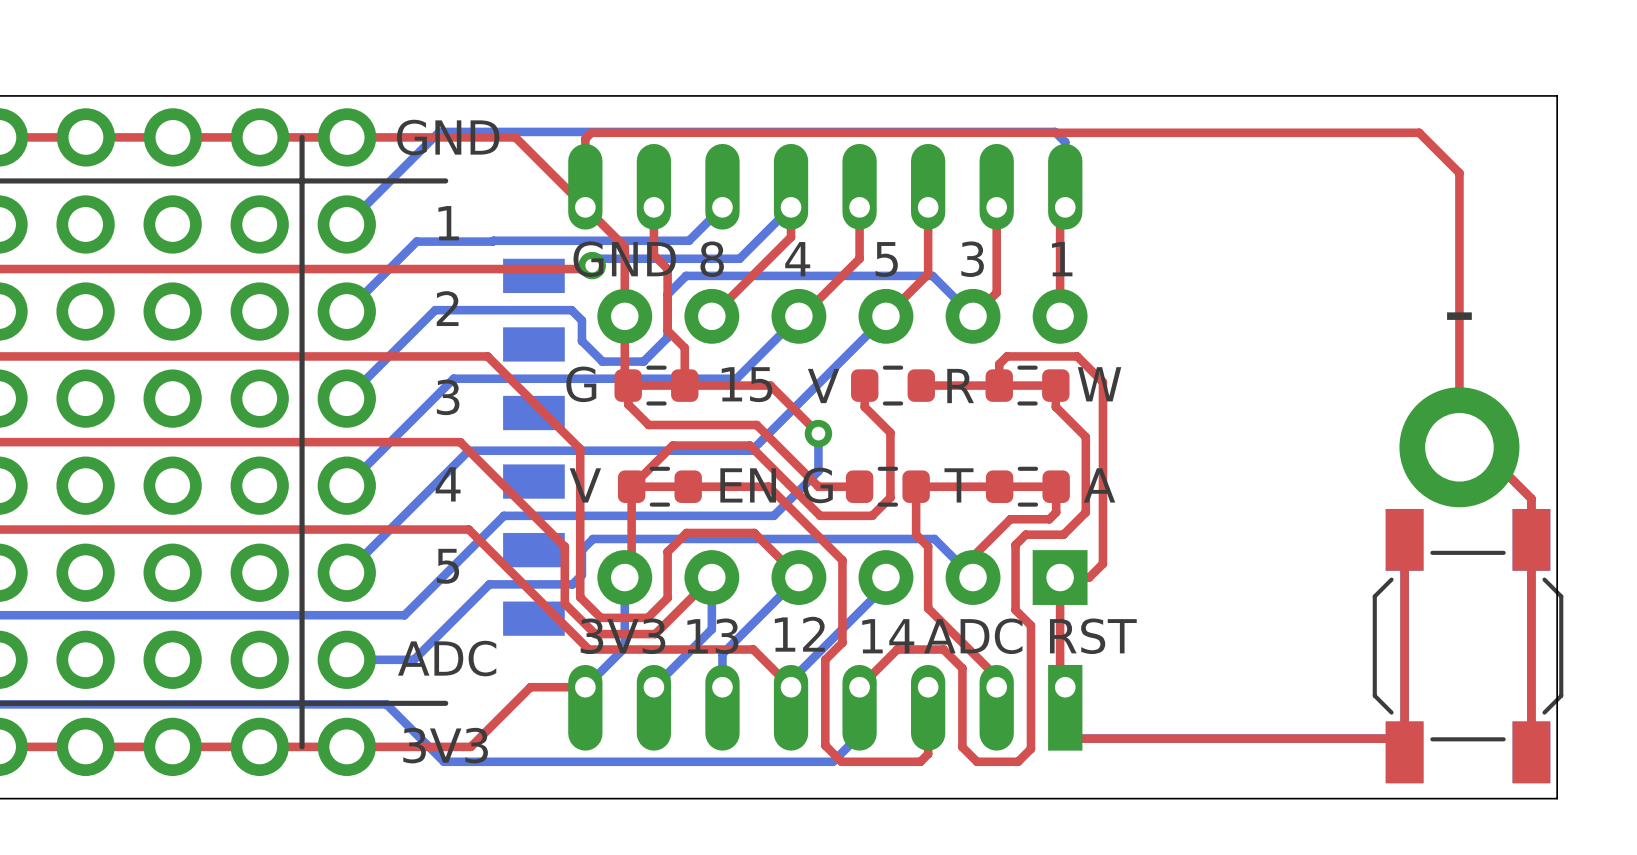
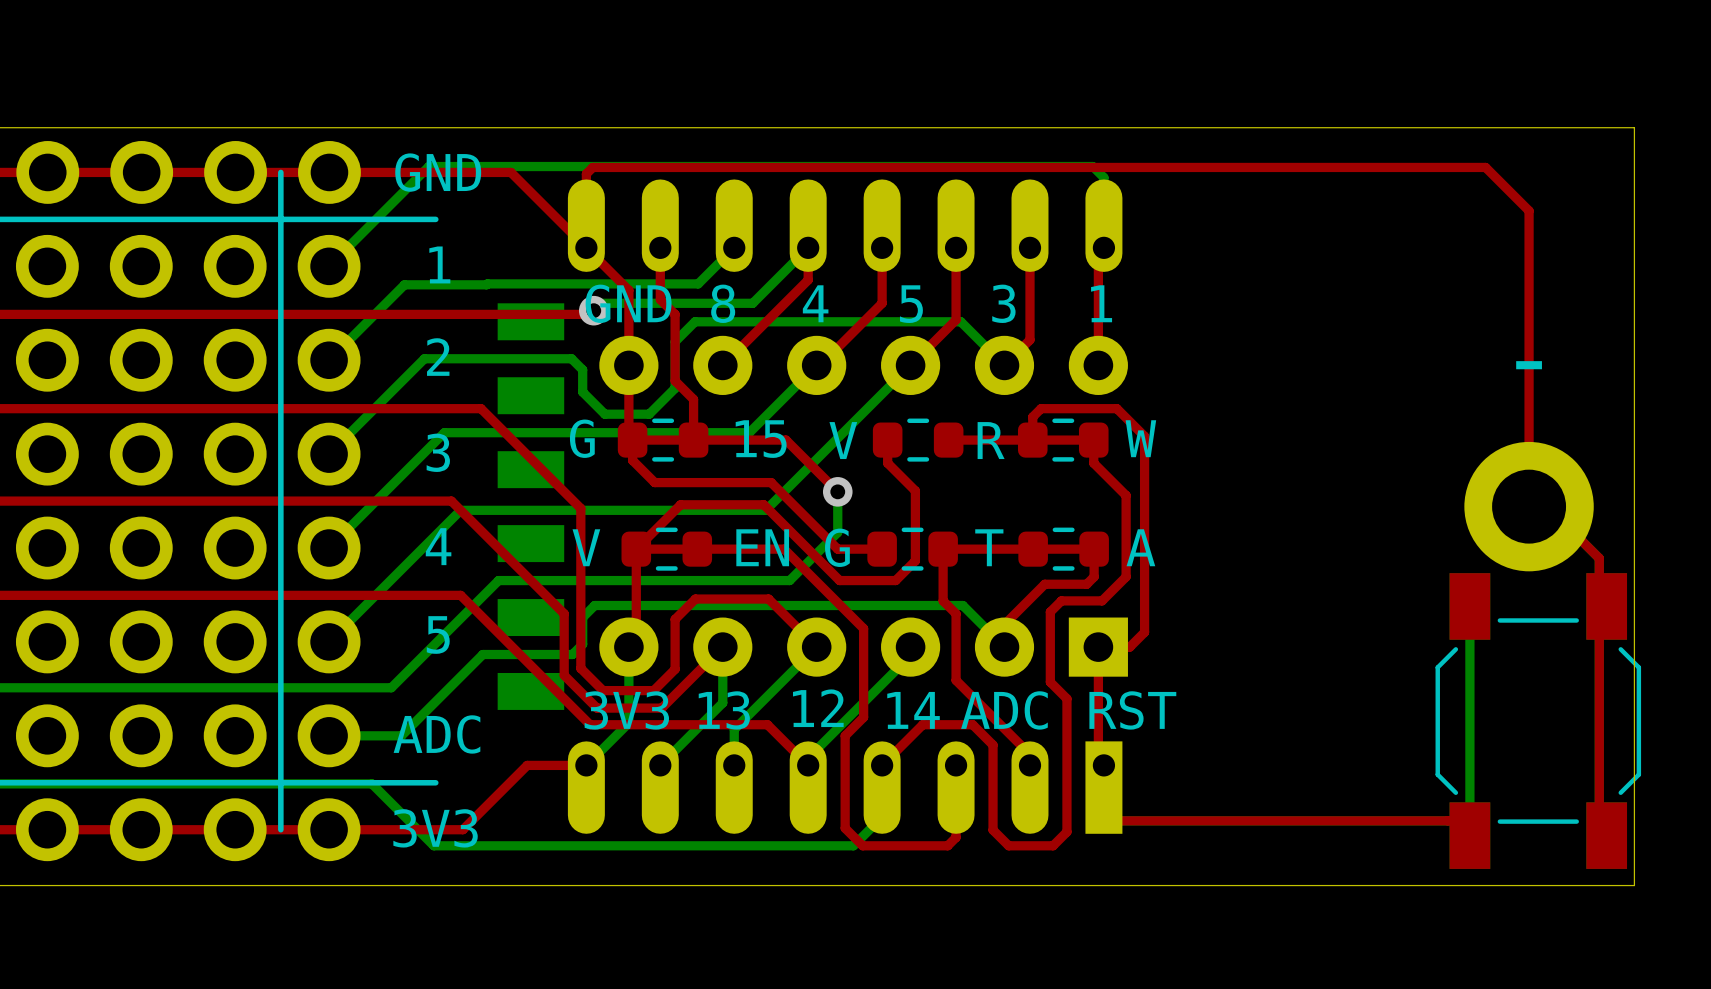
top track: none -> (1547, 506) (1599, 558) (1599, 835)
top track: (1480, 447) (1531, 498) (1531, 750) -> none
top track: (1404, 538) (1404, 752) -> none

